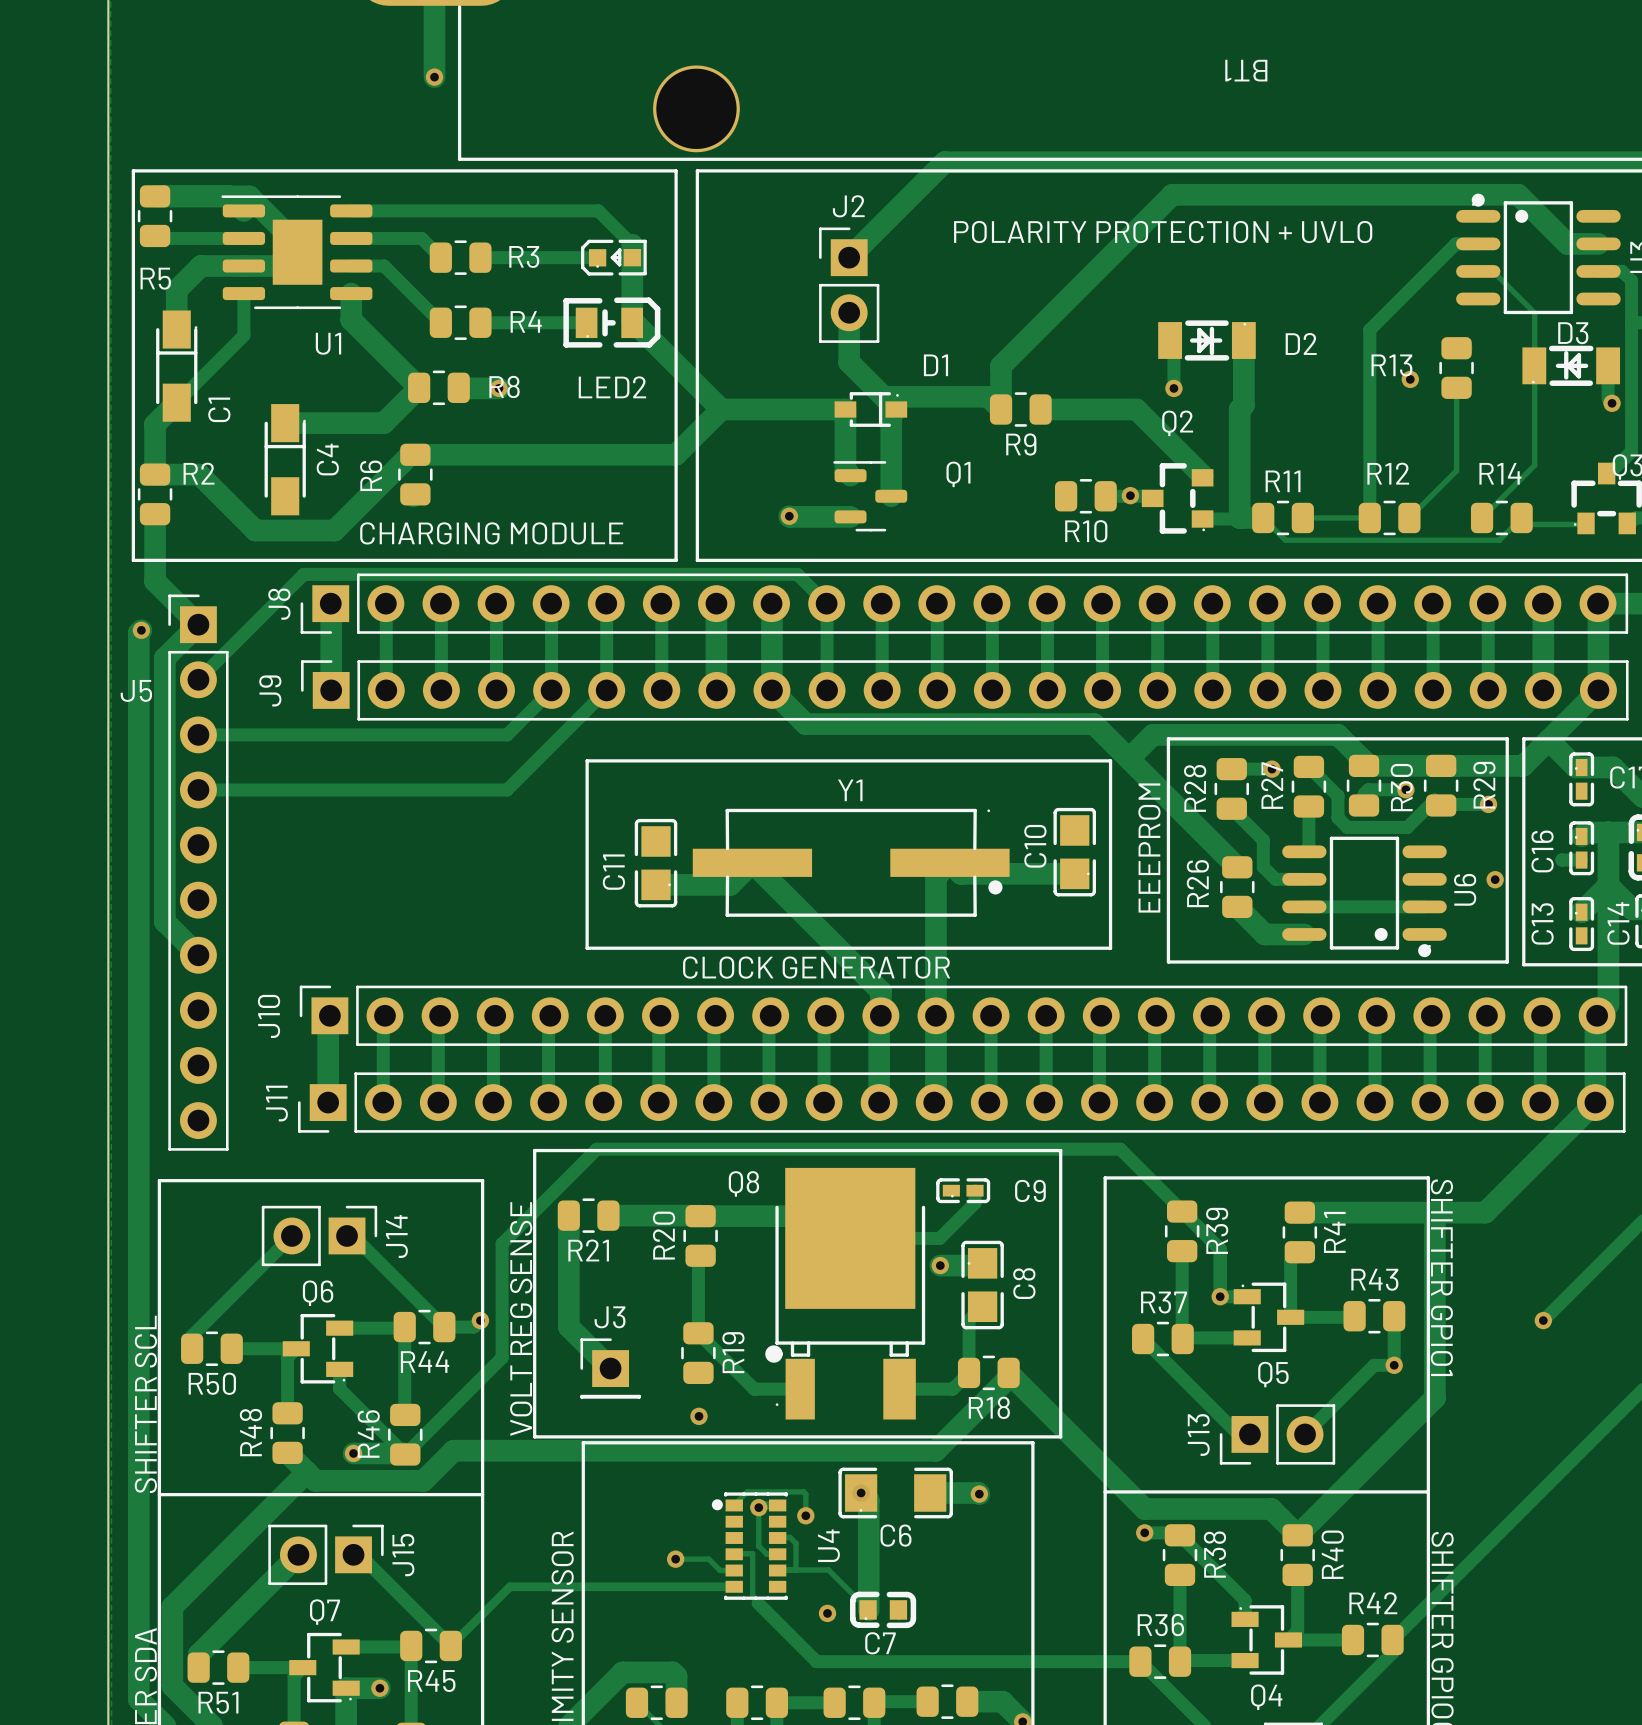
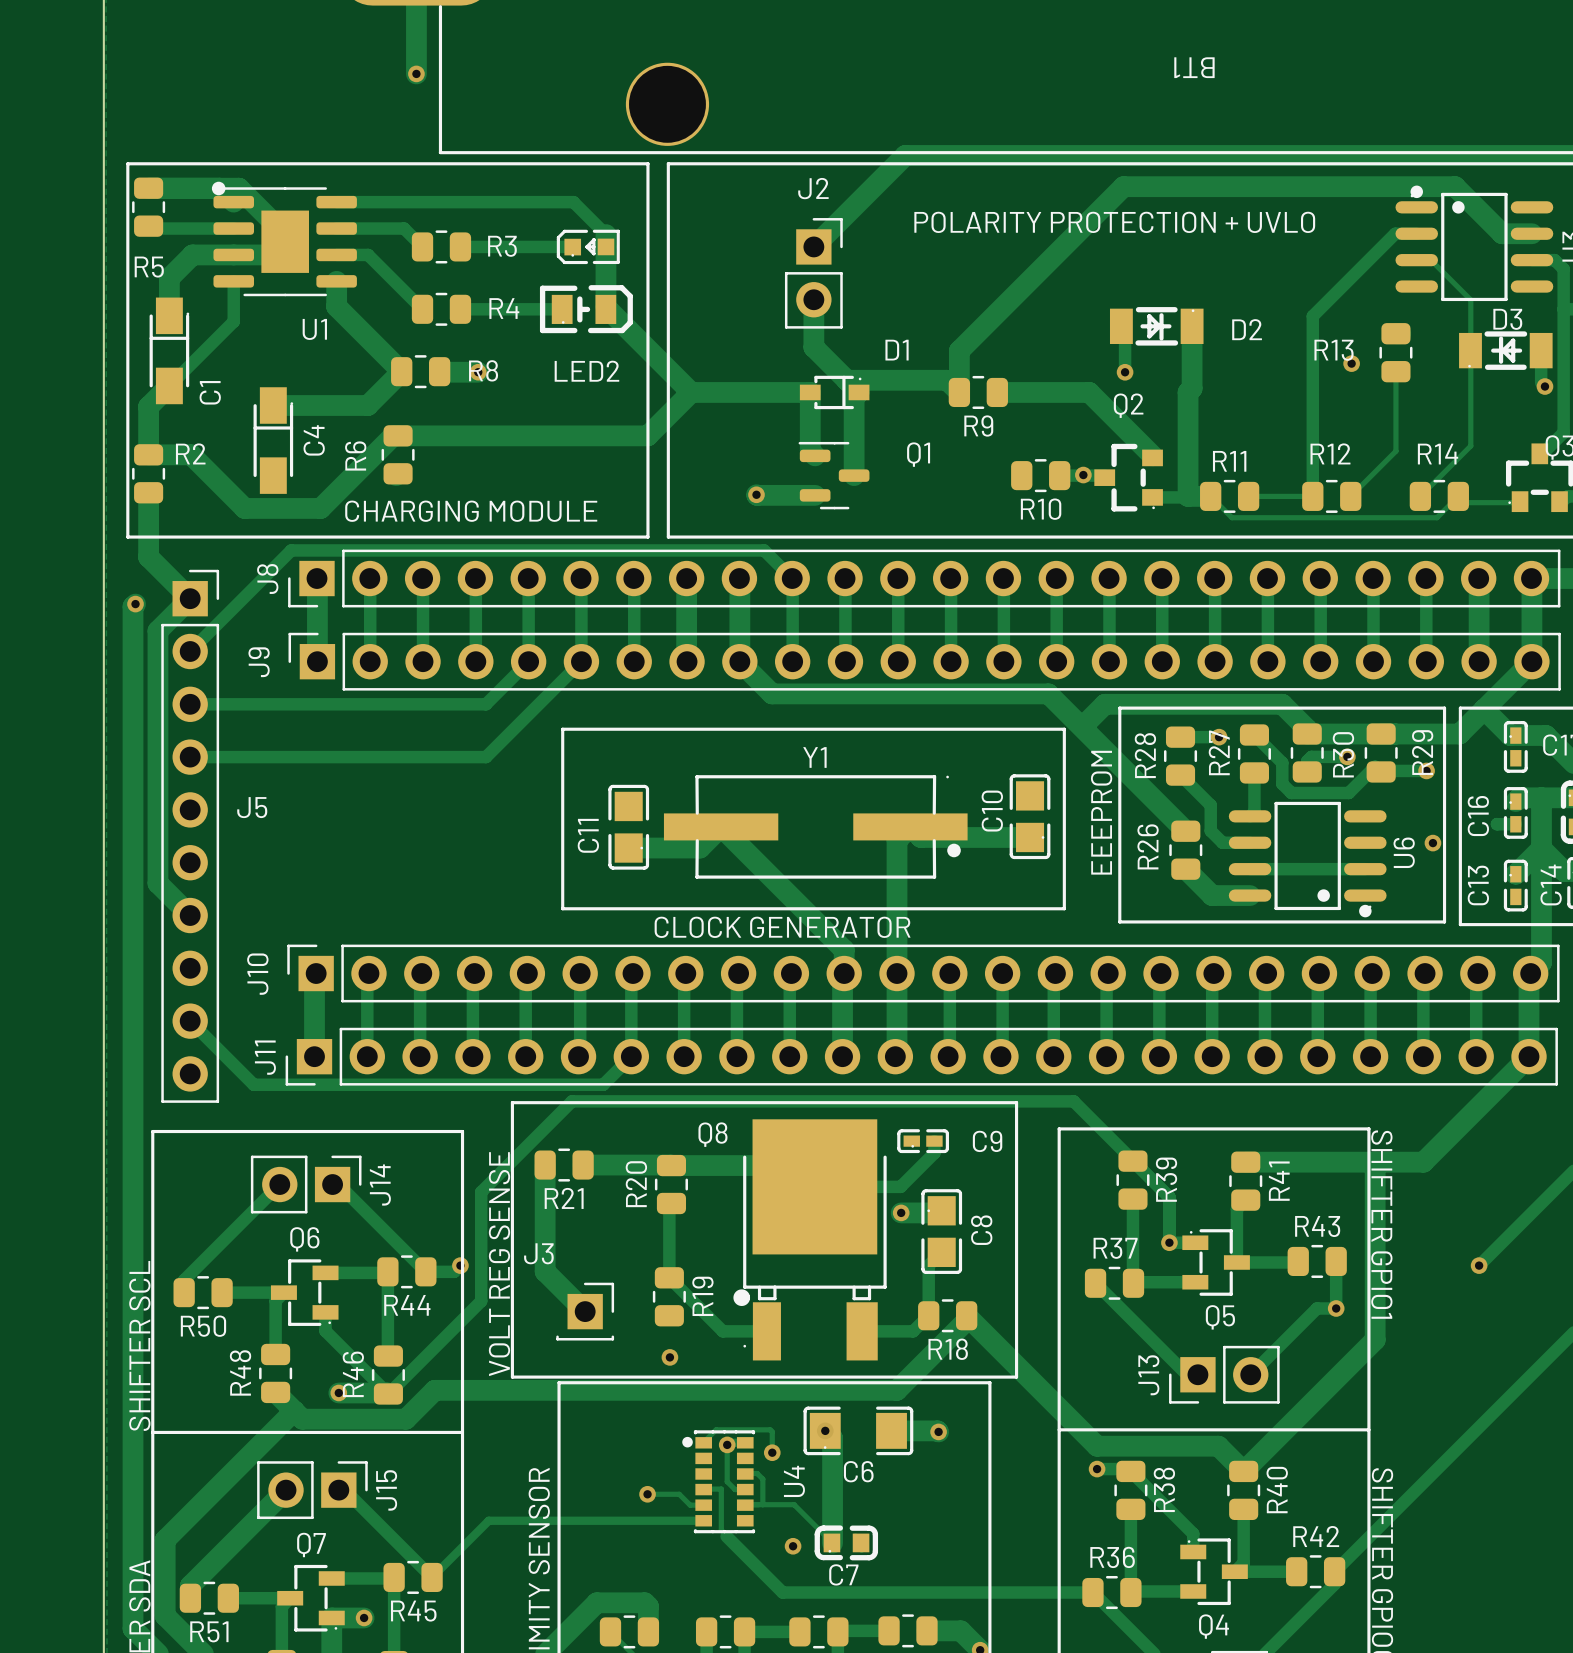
drawing: none -> [211, 181, 226, 196]
J2 footprint: [819, 227, 880, 343] -> [784, 218, 843, 329]
J5 footprint: [168, 594, 229, 1151] -> [161, 569, 220, 1103]
J5 name position: J5 (136, 690) -> J5 (252, 807)
track: none -> (190, 1021) (253, 1084) (603, 1084) (631, 1056)
J3 name position: J3 (610, 1317) -> J3 (538, 1253)
J3 footprint: [580, 1338, 641, 1399] -> [556, 1282, 615, 1341]

